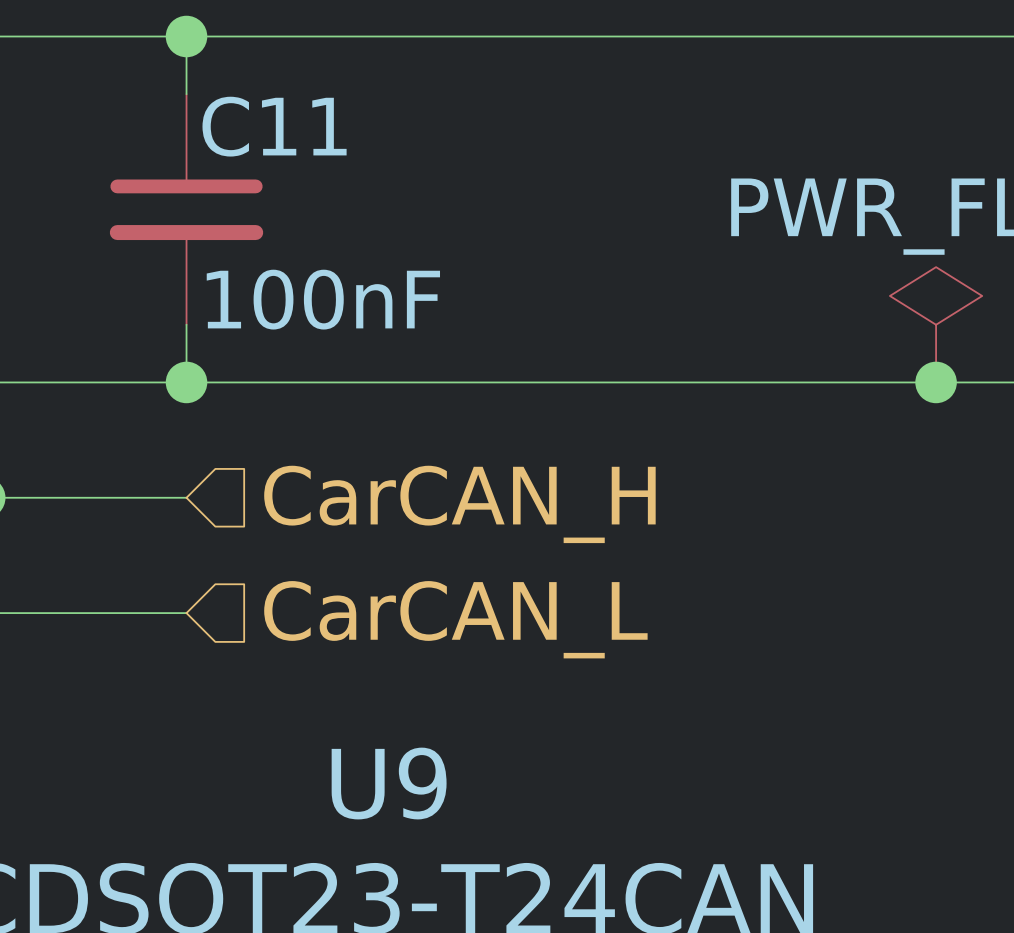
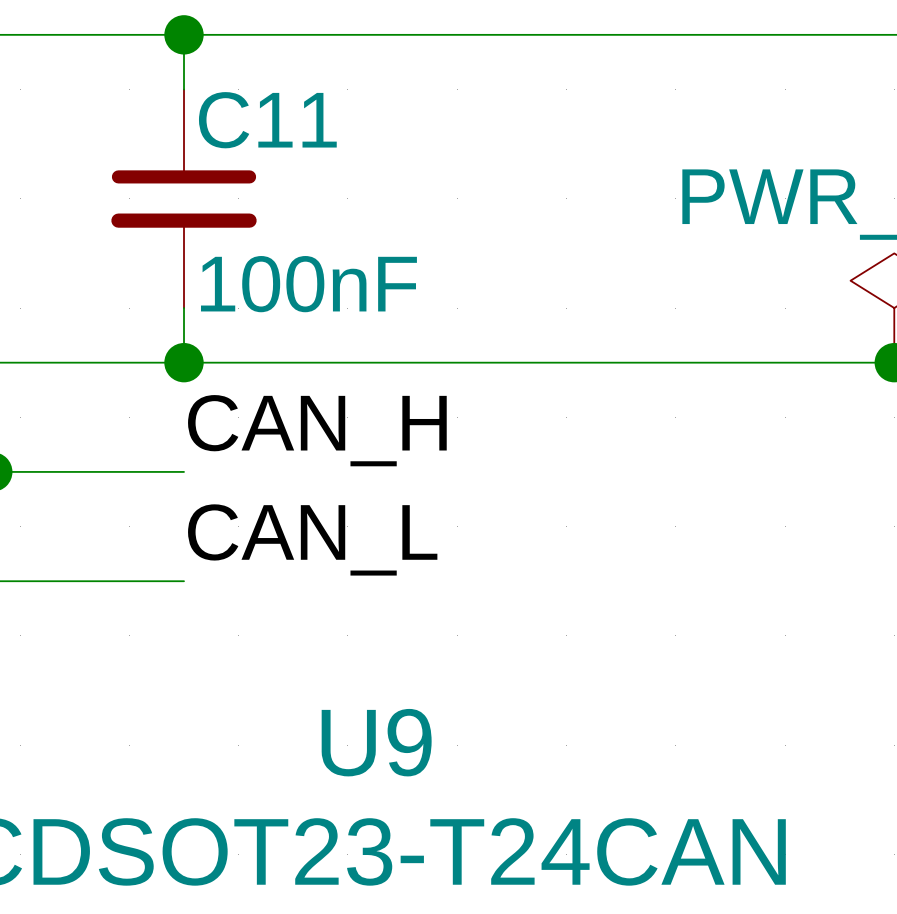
label: none -> CAN_H (317, 430)
hierarchical label: CarCAN_H (459, 504) -> none
label: none -> CAN_L (312, 539)
hierarchical label: CarCAN_L (455, 619) -> none

